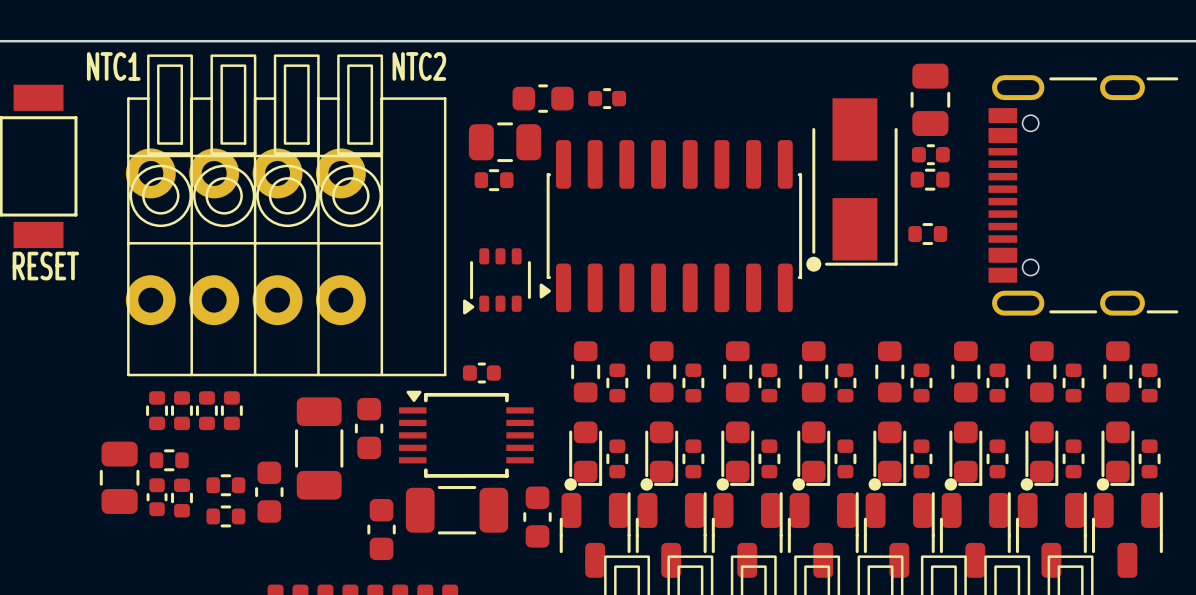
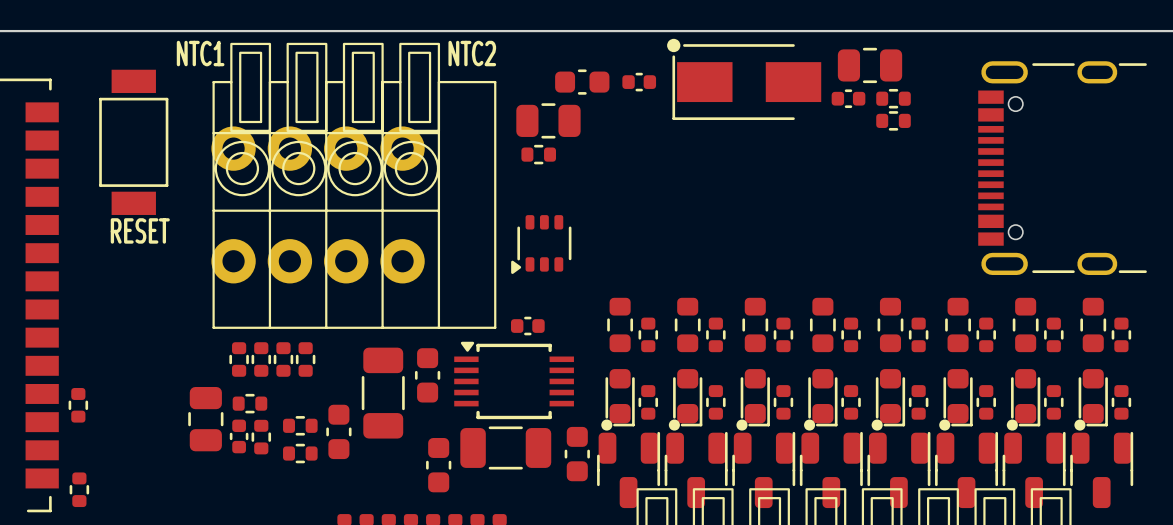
part rotation: 0° (930, 99) -> 90° clockwise (870, 65)
part position: (930, 99) -> (870, 65)
part: none -> (893, 98)
part: none -> (893, 120)
part position: (930, 154) -> (848, 98)
part: (930, 179) -> none
part rotation: 0° (851, 184) -> 90° clockwise (744, 79)
part position: (851, 184) -> (744, 79)
part: (670, 226) -> none
part: (927, 234) -> none

